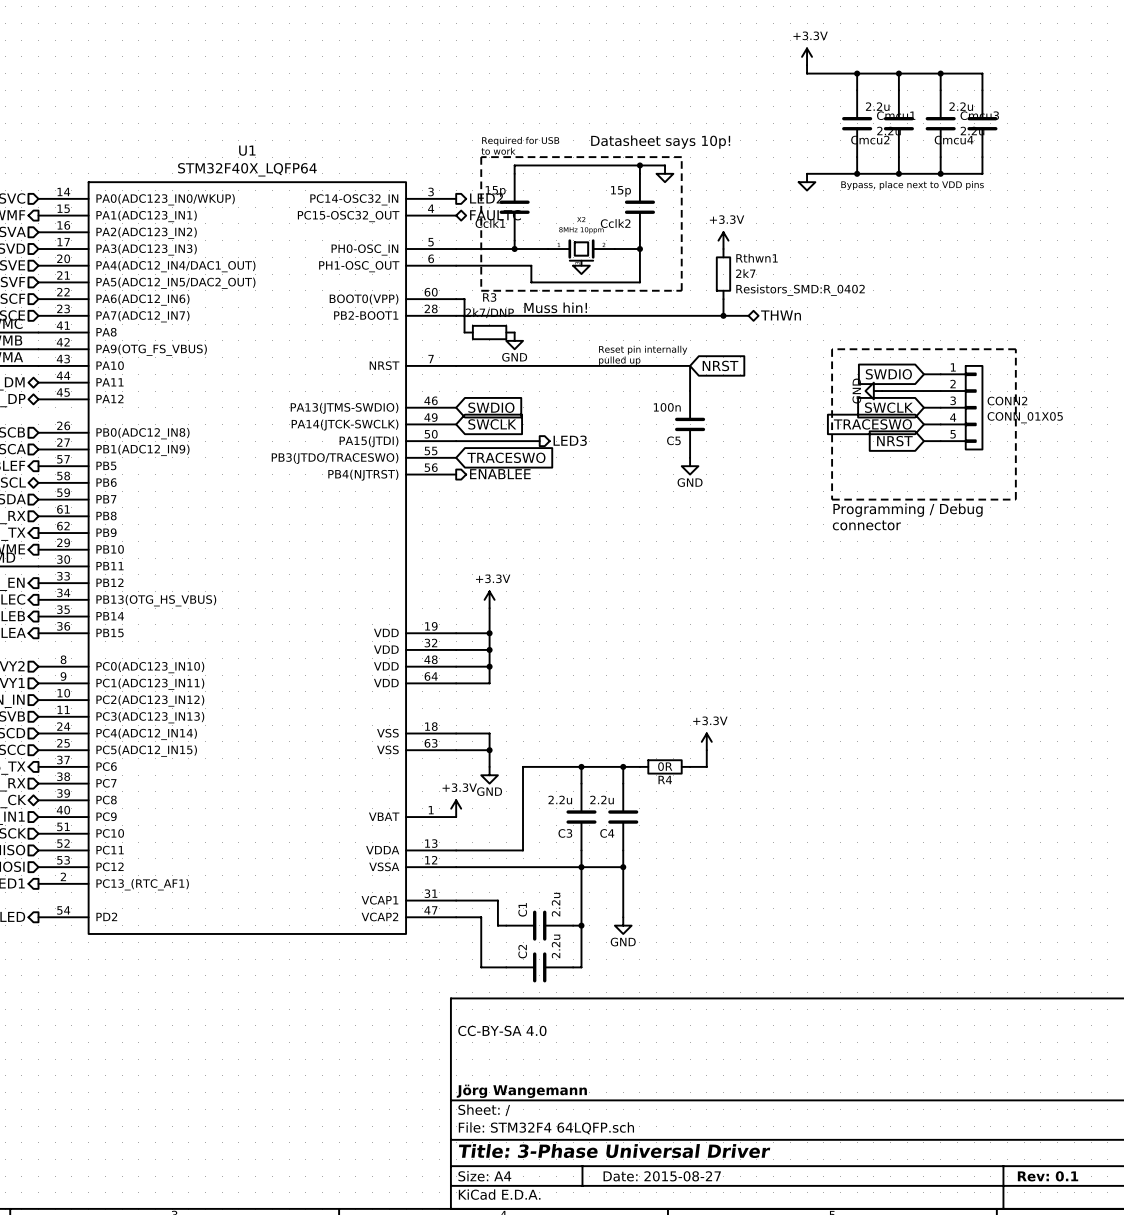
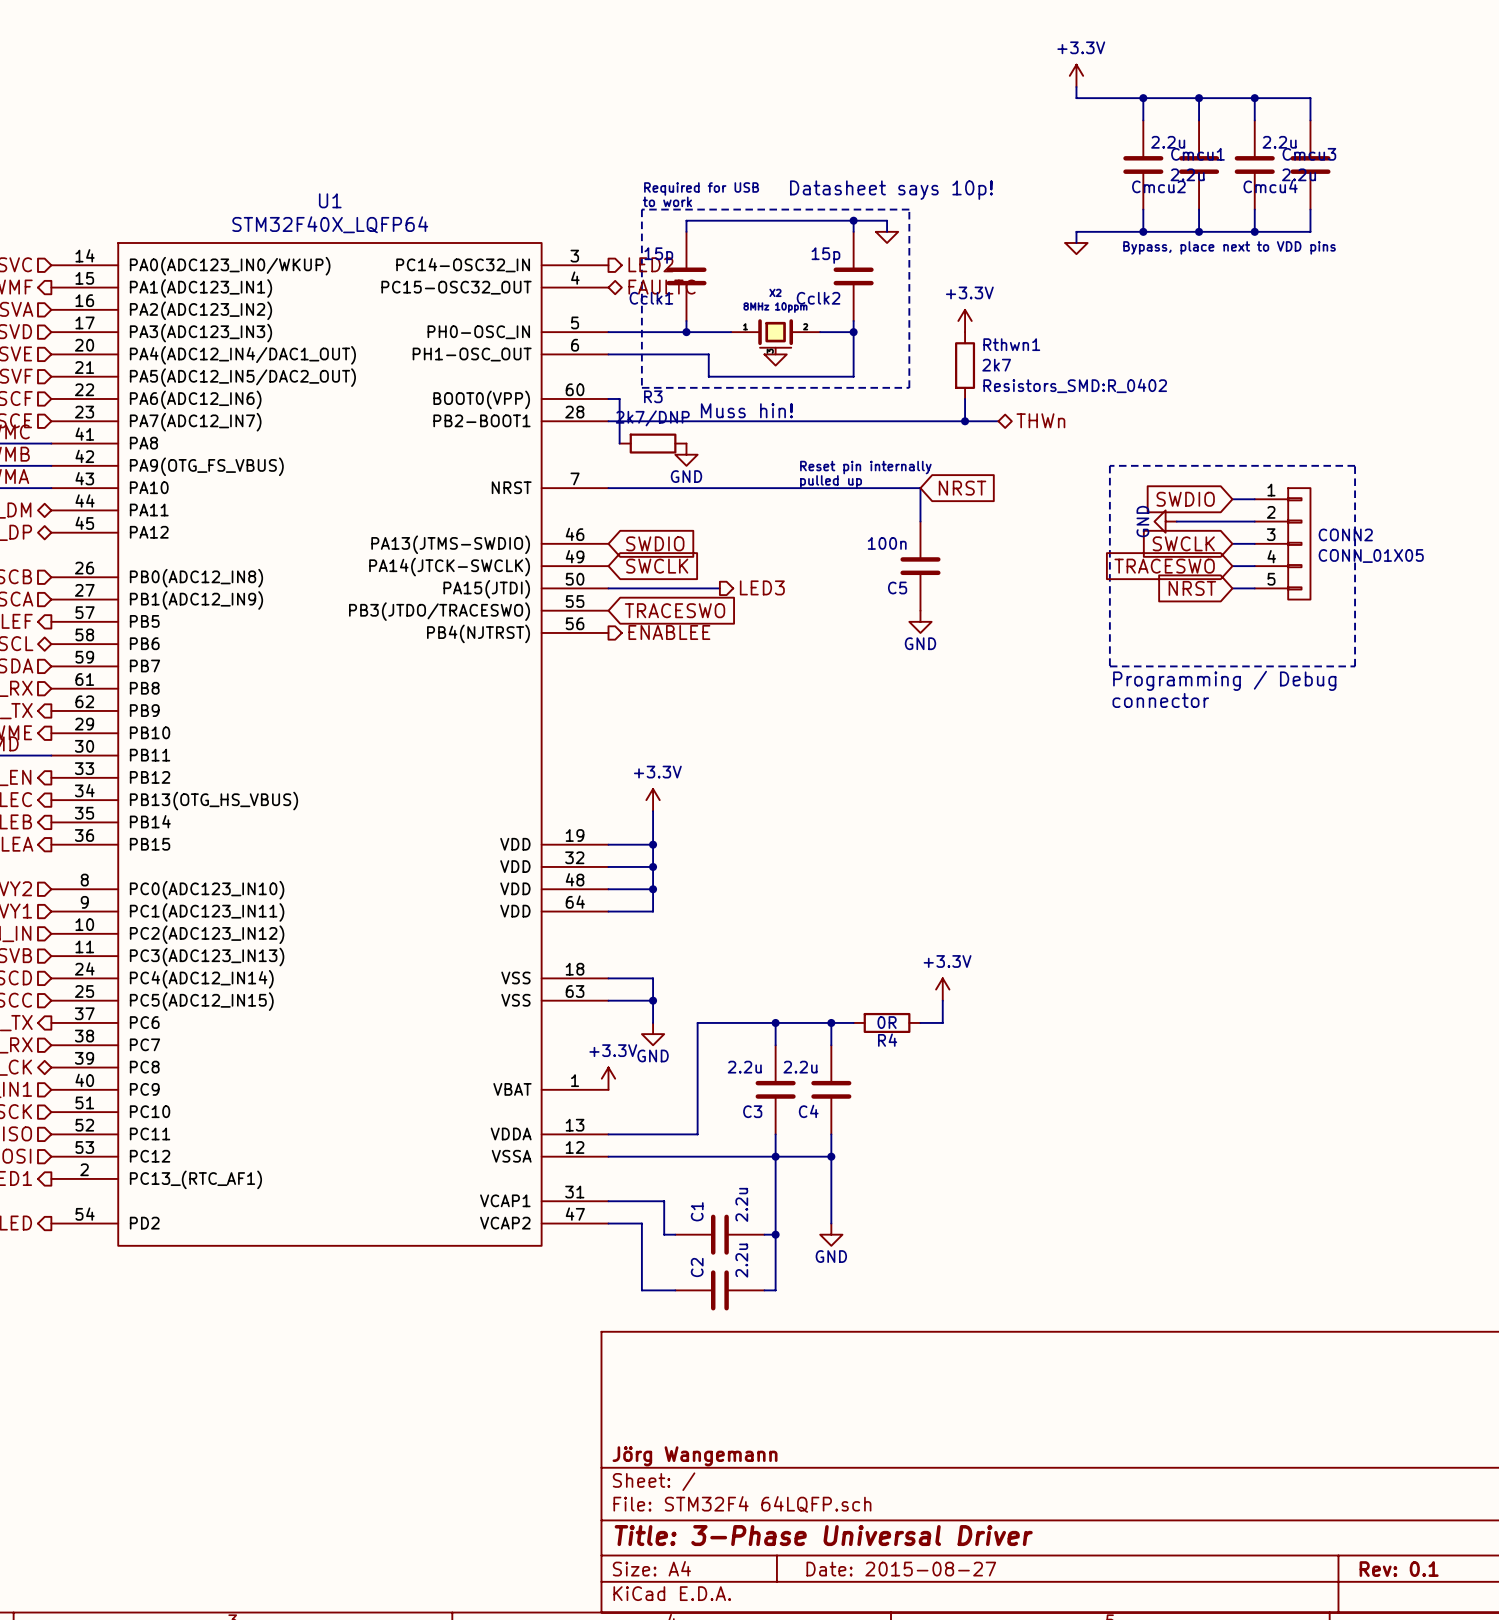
title block: CC-BY-SA 4.0 (502, 1030) -> none

